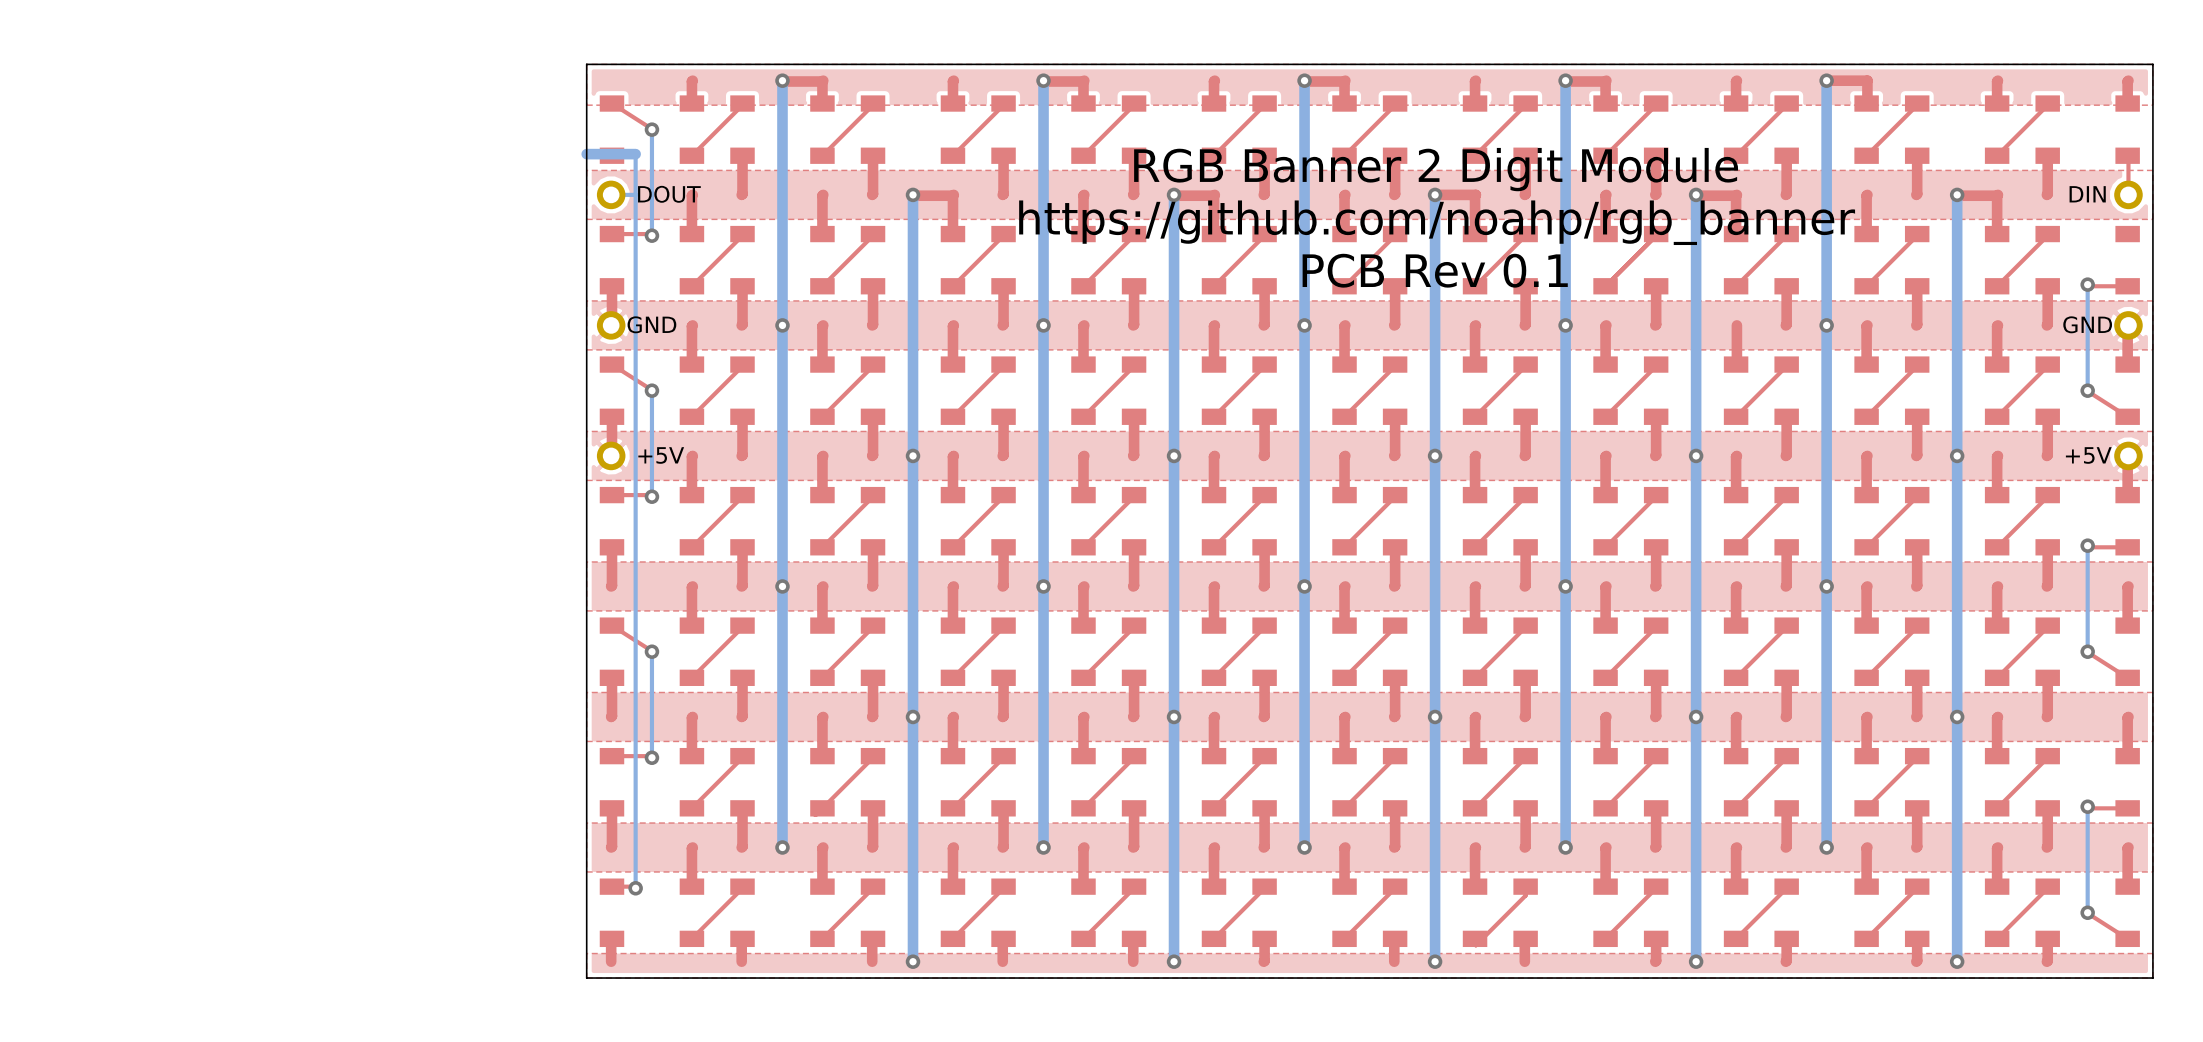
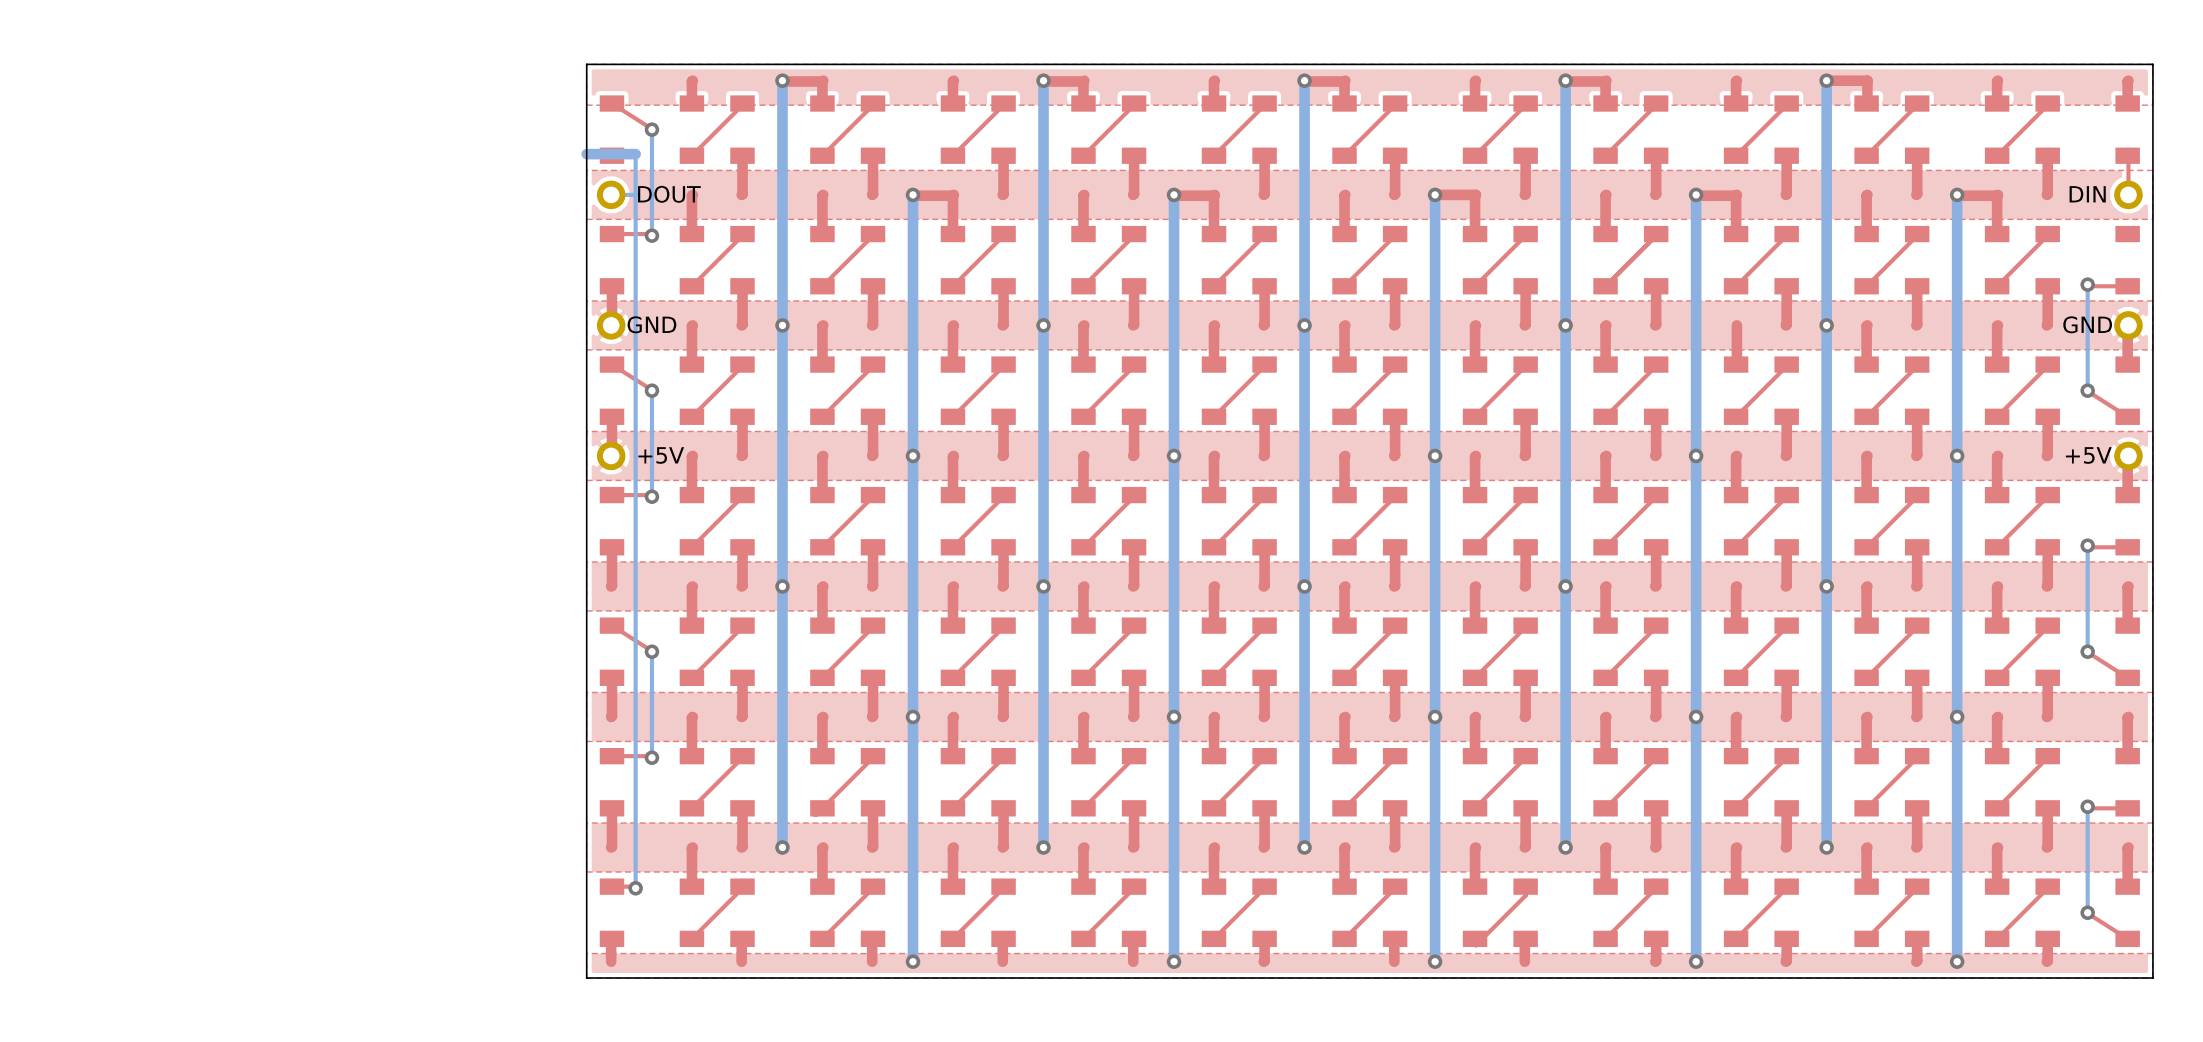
text: RGB Banner 2 Digit Module (1436, 169) -> none
text: https://github.com/noahp/rgb_banner (1437, 222) -> none
text: PCB Rev 0.1 (1435, 270) -> none

